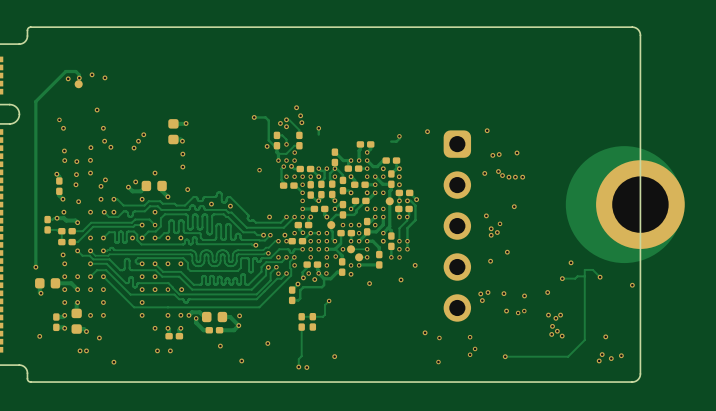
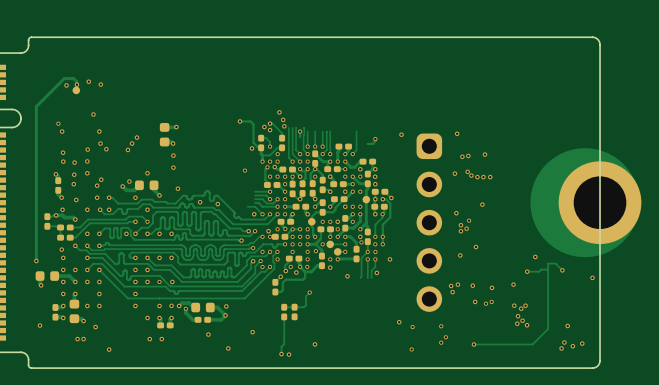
track: none -> (288, 127) (288, 157) (292, 161)
track: none -> (292, 127) (292, 154) (300, 161)
track: none -> (296, 127) (296, 150) (300, 154)
track: none -> (303, 127) (303, 150) (307, 154)
track: none -> (307, 131) (307, 146)
track: none -> (315, 131) (315, 146)
track: none -> (322, 131) (322, 146)
track: none -> (326, 131) (326, 150) (322, 154)
track: none -> (330, 131) (330, 154)
track: none -> (356, 131) (356, 150) (352, 154)
via: none -> (307, 146)
via: none -> (315, 146)
via: none -> (322, 146)
via: none -> (300, 154)
via: none -> (307, 154)
via: none -> (322, 154)
via: none -> (330, 154)
via: none -> (352, 154)
via: none -> (292, 161)
via: none -> (300, 161)
via: none -> (307, 161)
track: none -> (270, 191) (255, 191)
via: none -> (270, 191)
track: none -> (255, 195) (266, 195) (270, 199)
via: none -> (270, 199)
track: none -> (277, 199) (273, 203) (266, 203) (262, 199) (255, 199)
via: none -> (277, 199)
track: none -> (255, 202) (258, 202) (262, 206) (277, 206)
track: none -> (247, 206) (255, 206) (262, 214)
via: none -> (277, 206)
via: none -> (262, 214)
via: none -> (361, 242)
track: none -> (367, 251) (361, 258) (360, 278)
track: none -> (367, 259) (367, 278)
via: none -> (367, 259)
track: none -> (375, 259) (371, 278)
via: none -> (375, 259)

